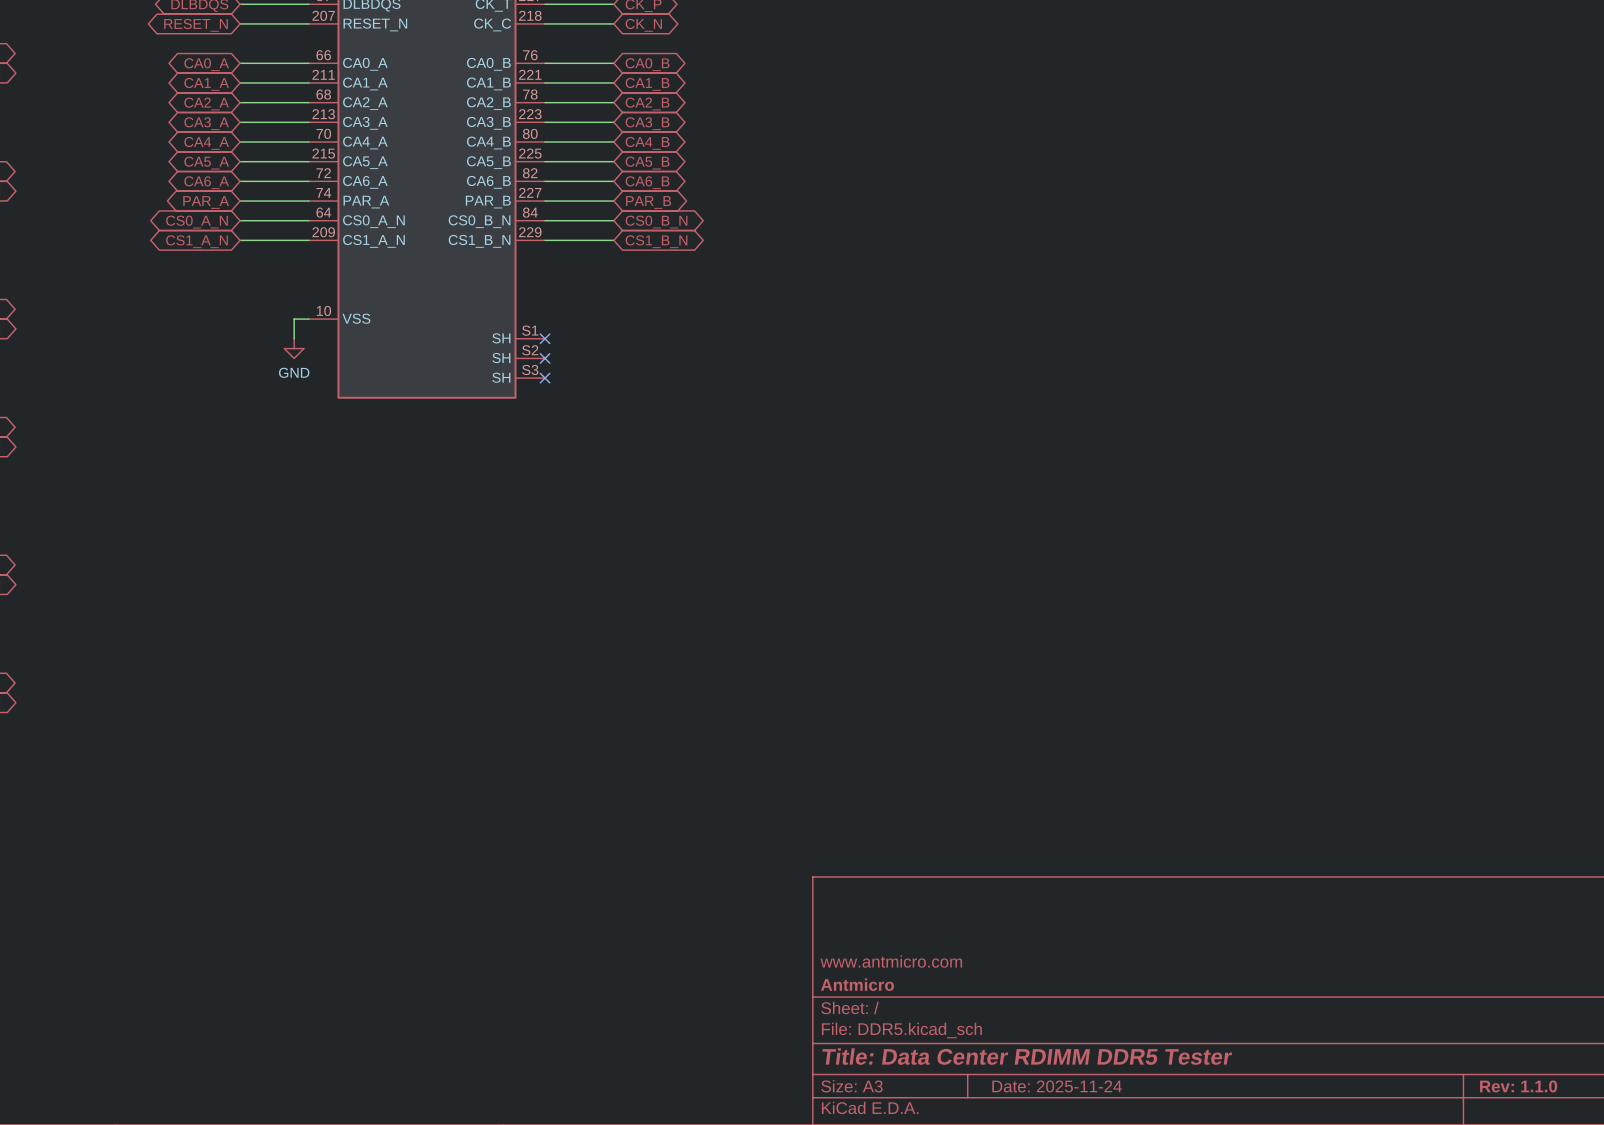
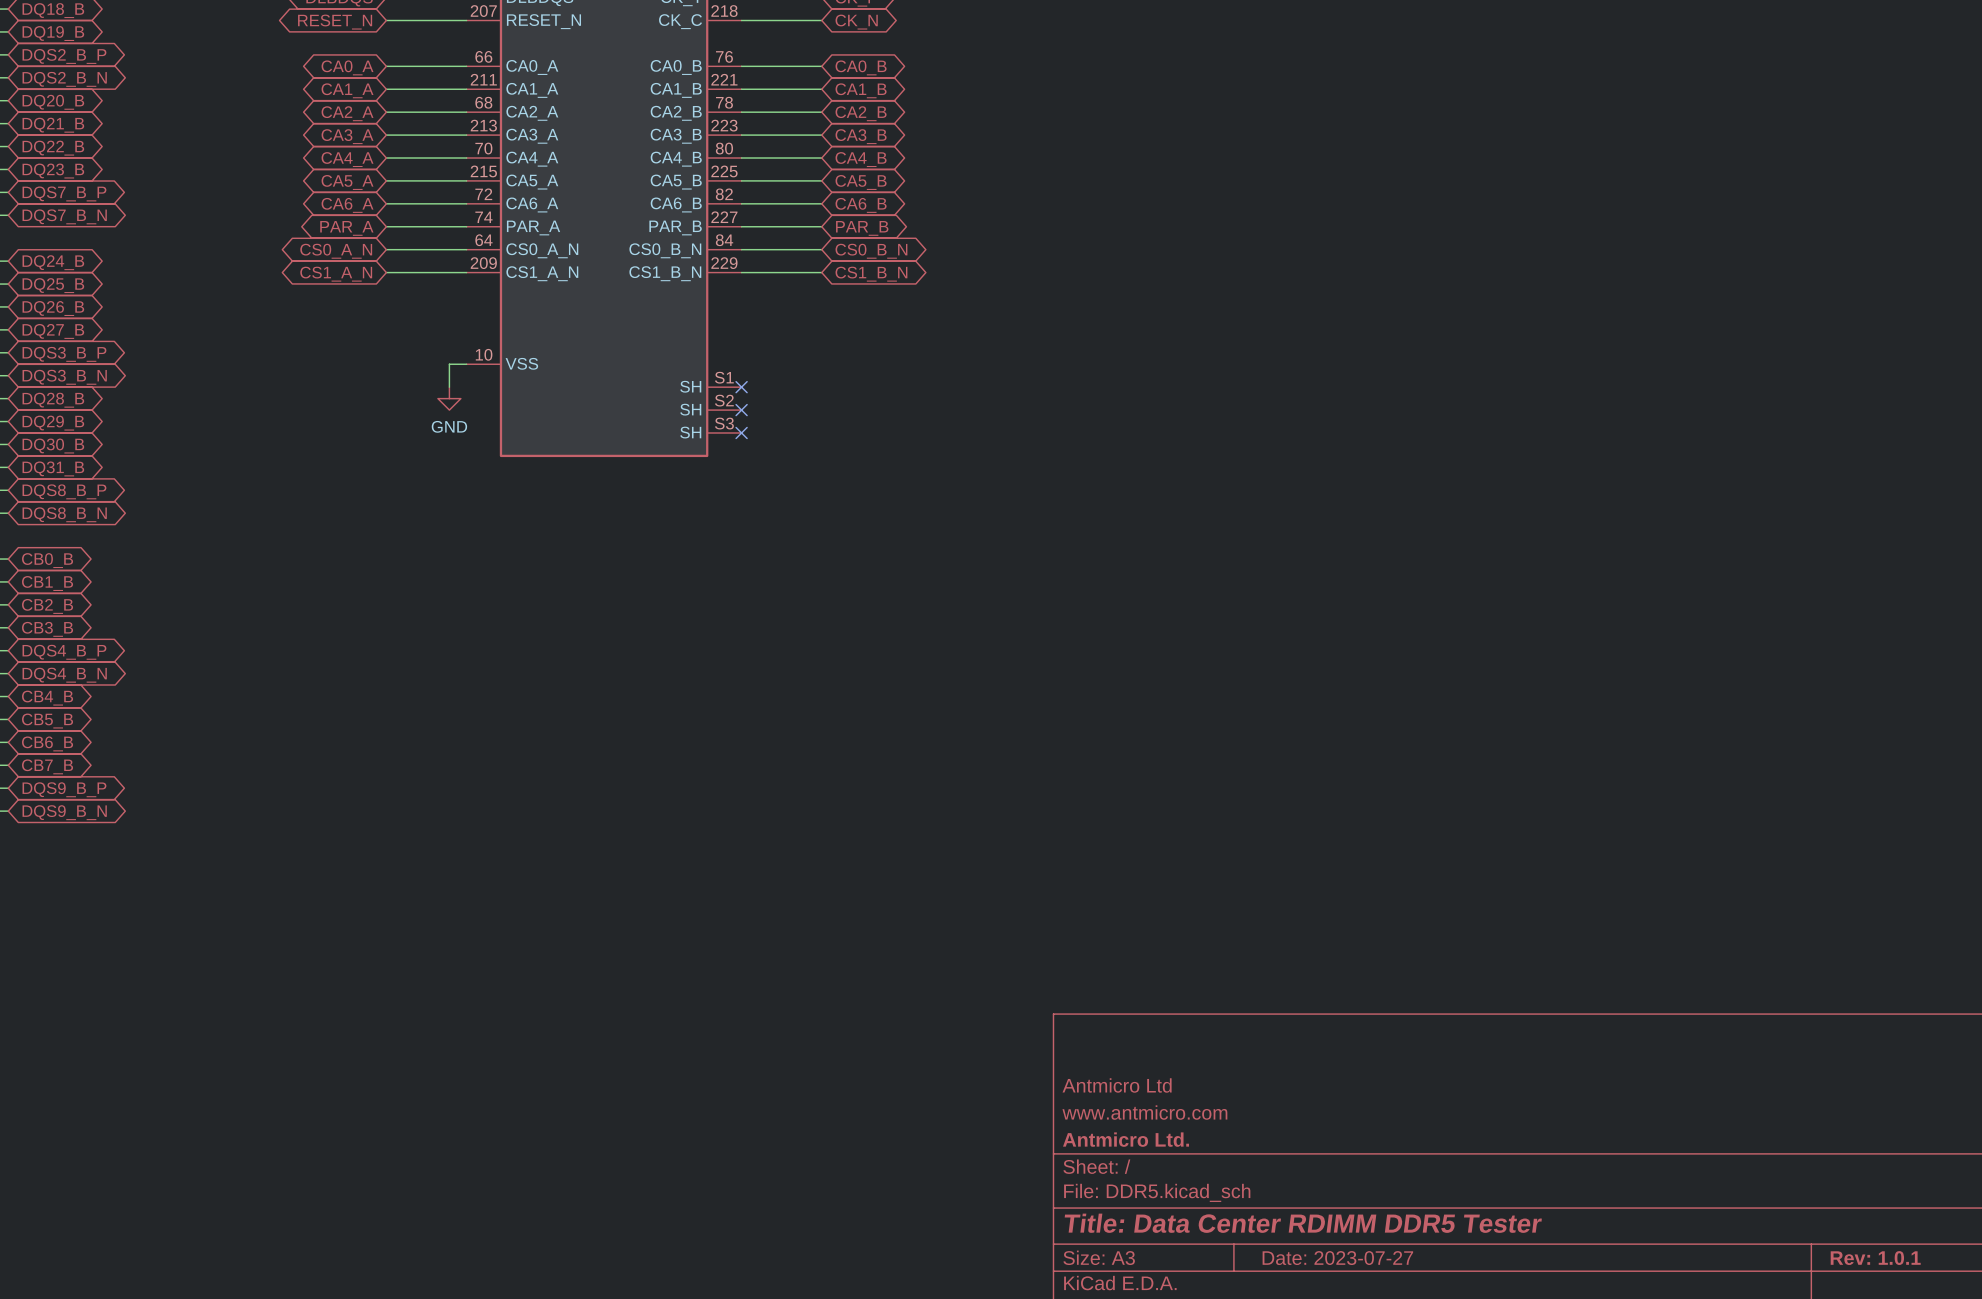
title block: none -> Antmicro Ltd (1117, 1085)
title block: Antmicro (857, 984) -> Antmicro Ltd. (1126, 1139)
title block: Date: 2025-11-24 (1057, 1086) -> Date: 2023-07-27 (1337, 1258)
title block: Rev: 1.1.0 (1518, 1086) -> Rev: 1.0.1 (1875, 1258)

